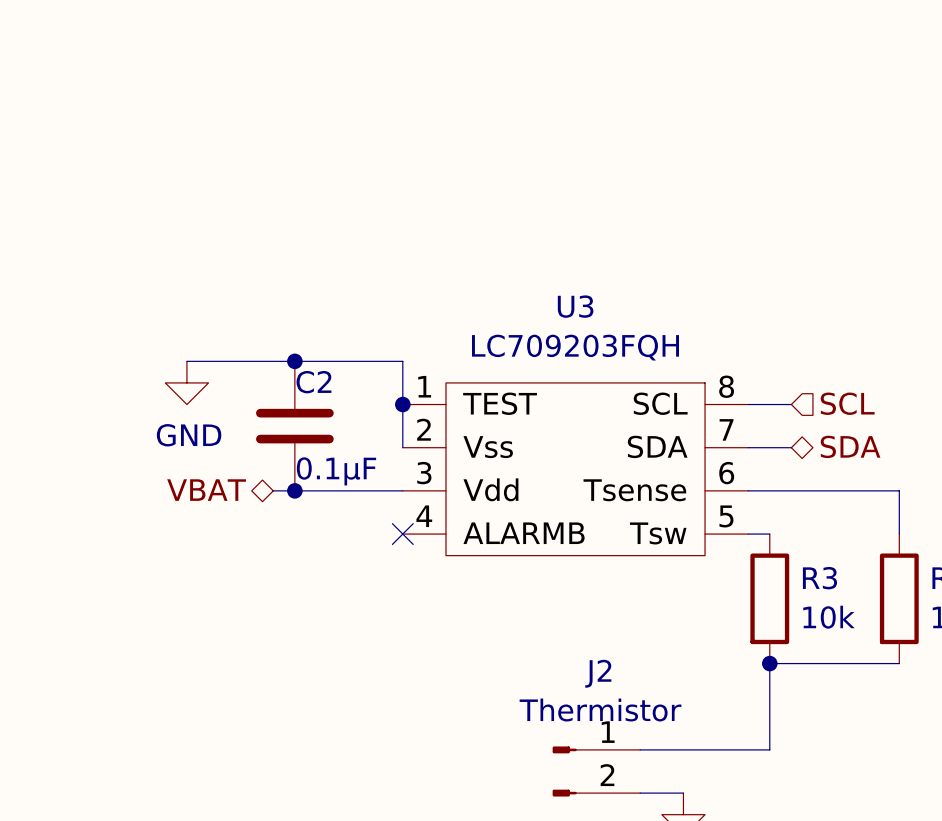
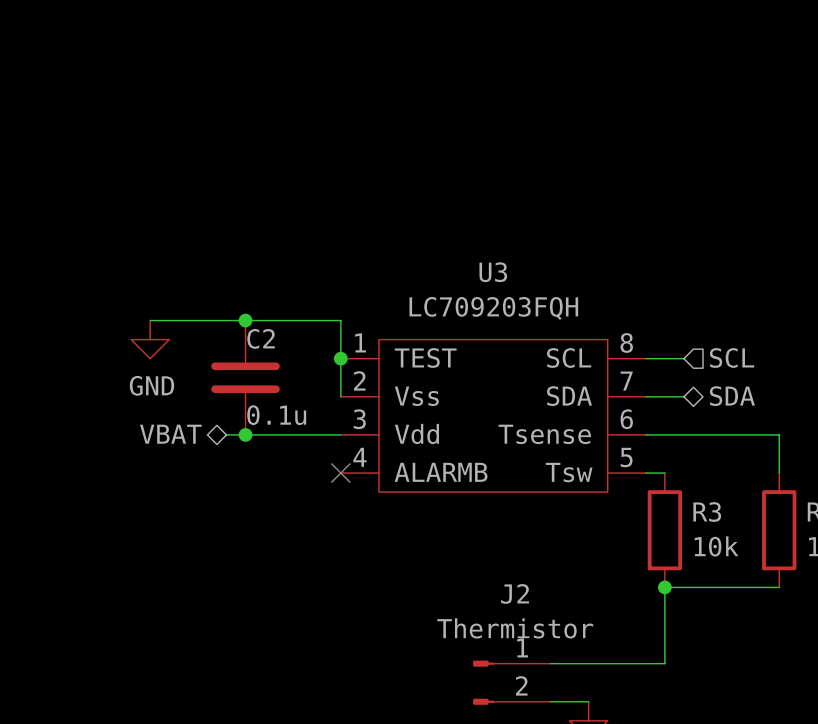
C2 value: 0.1µF (336, 471) -> 0.1u (276, 415)

